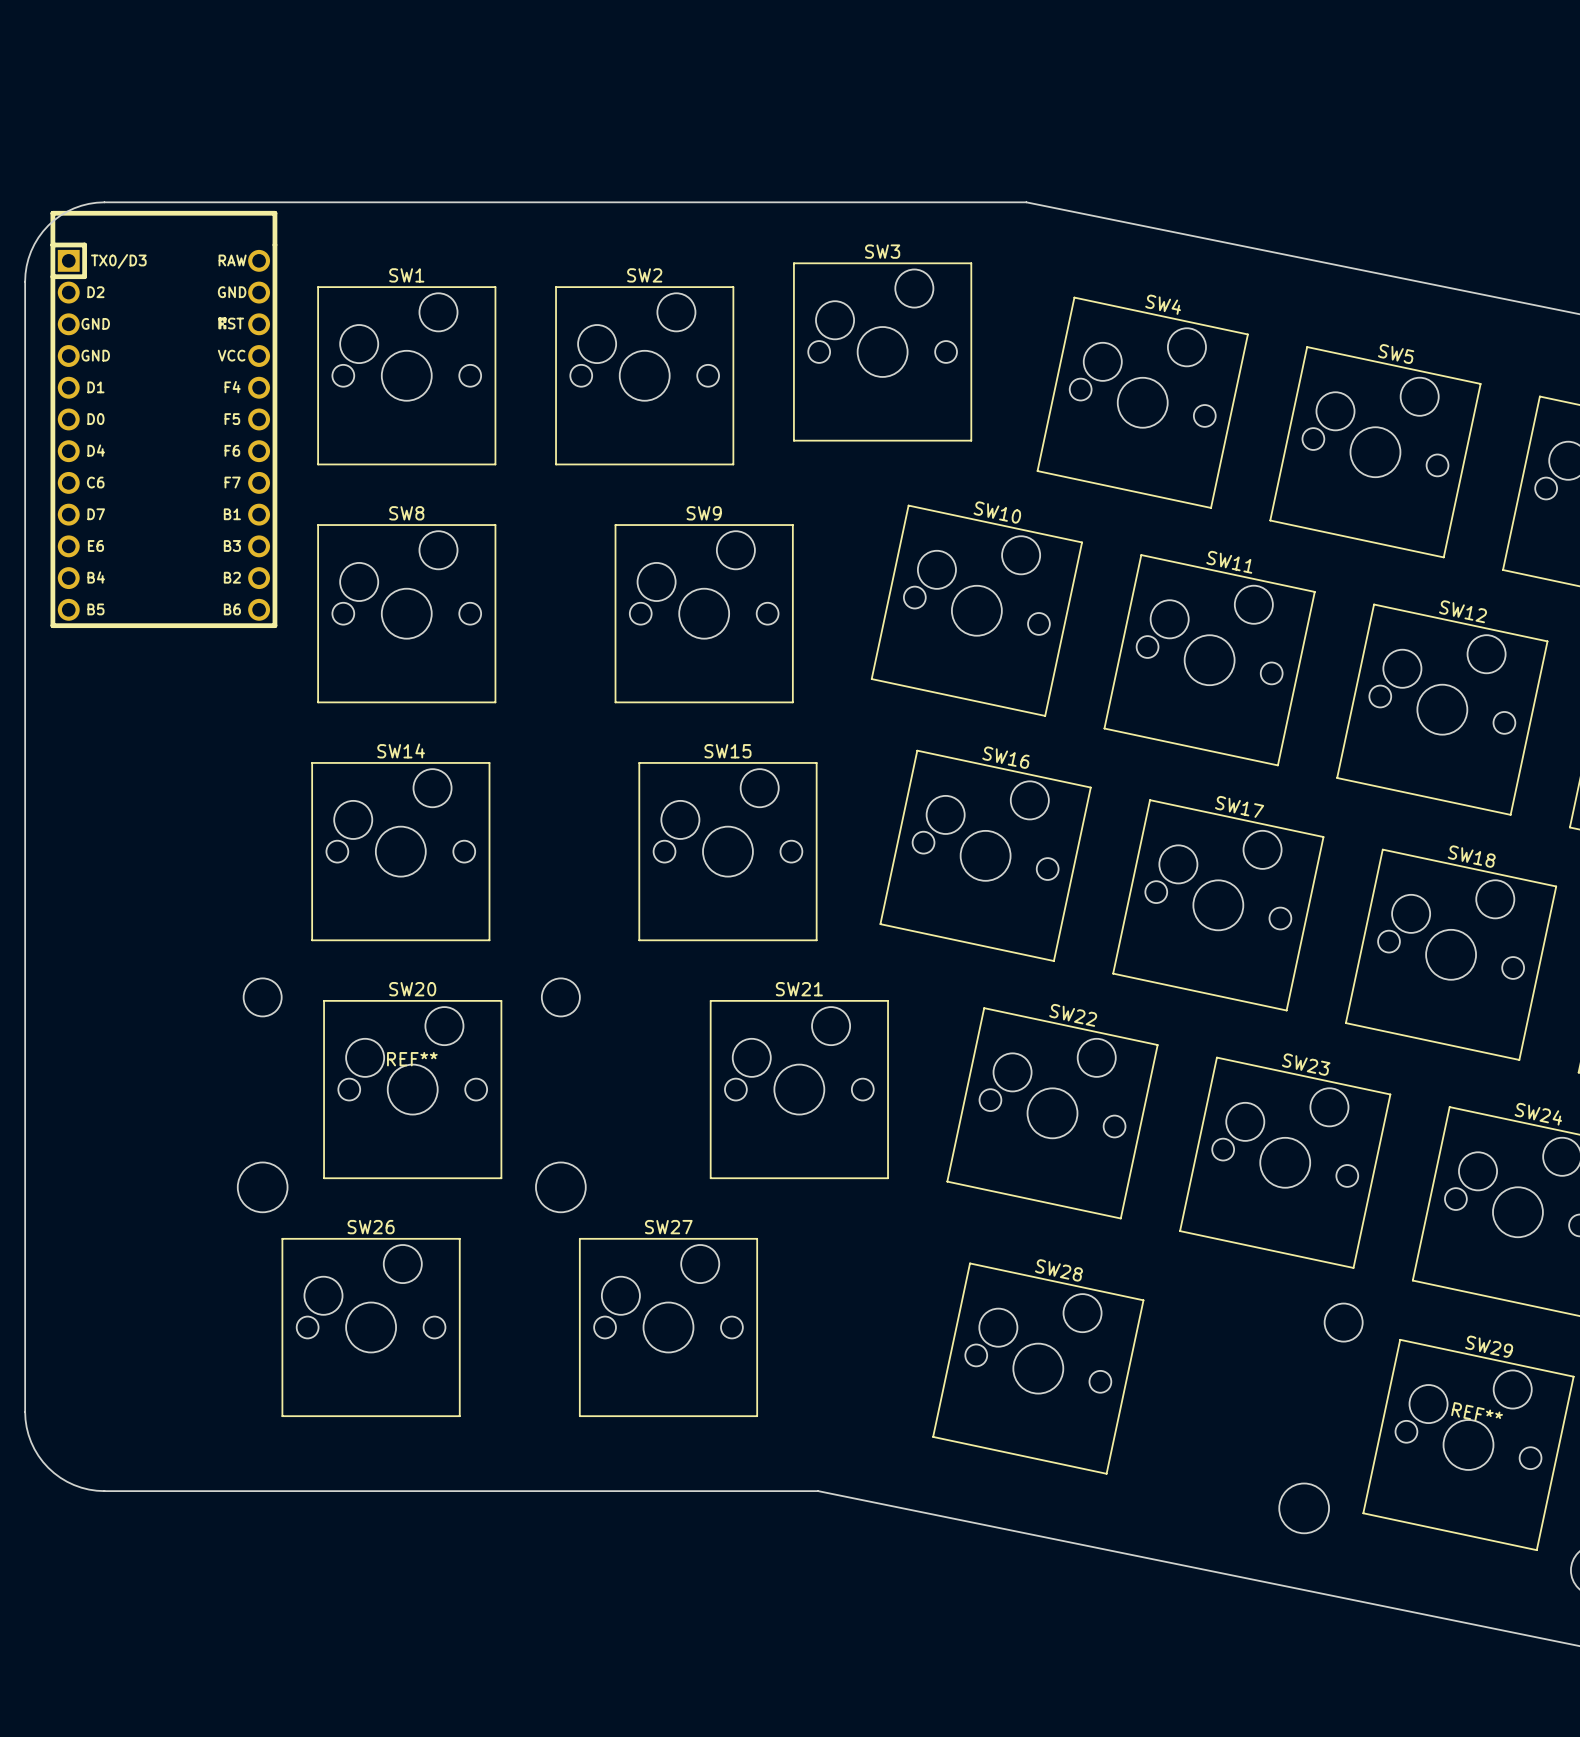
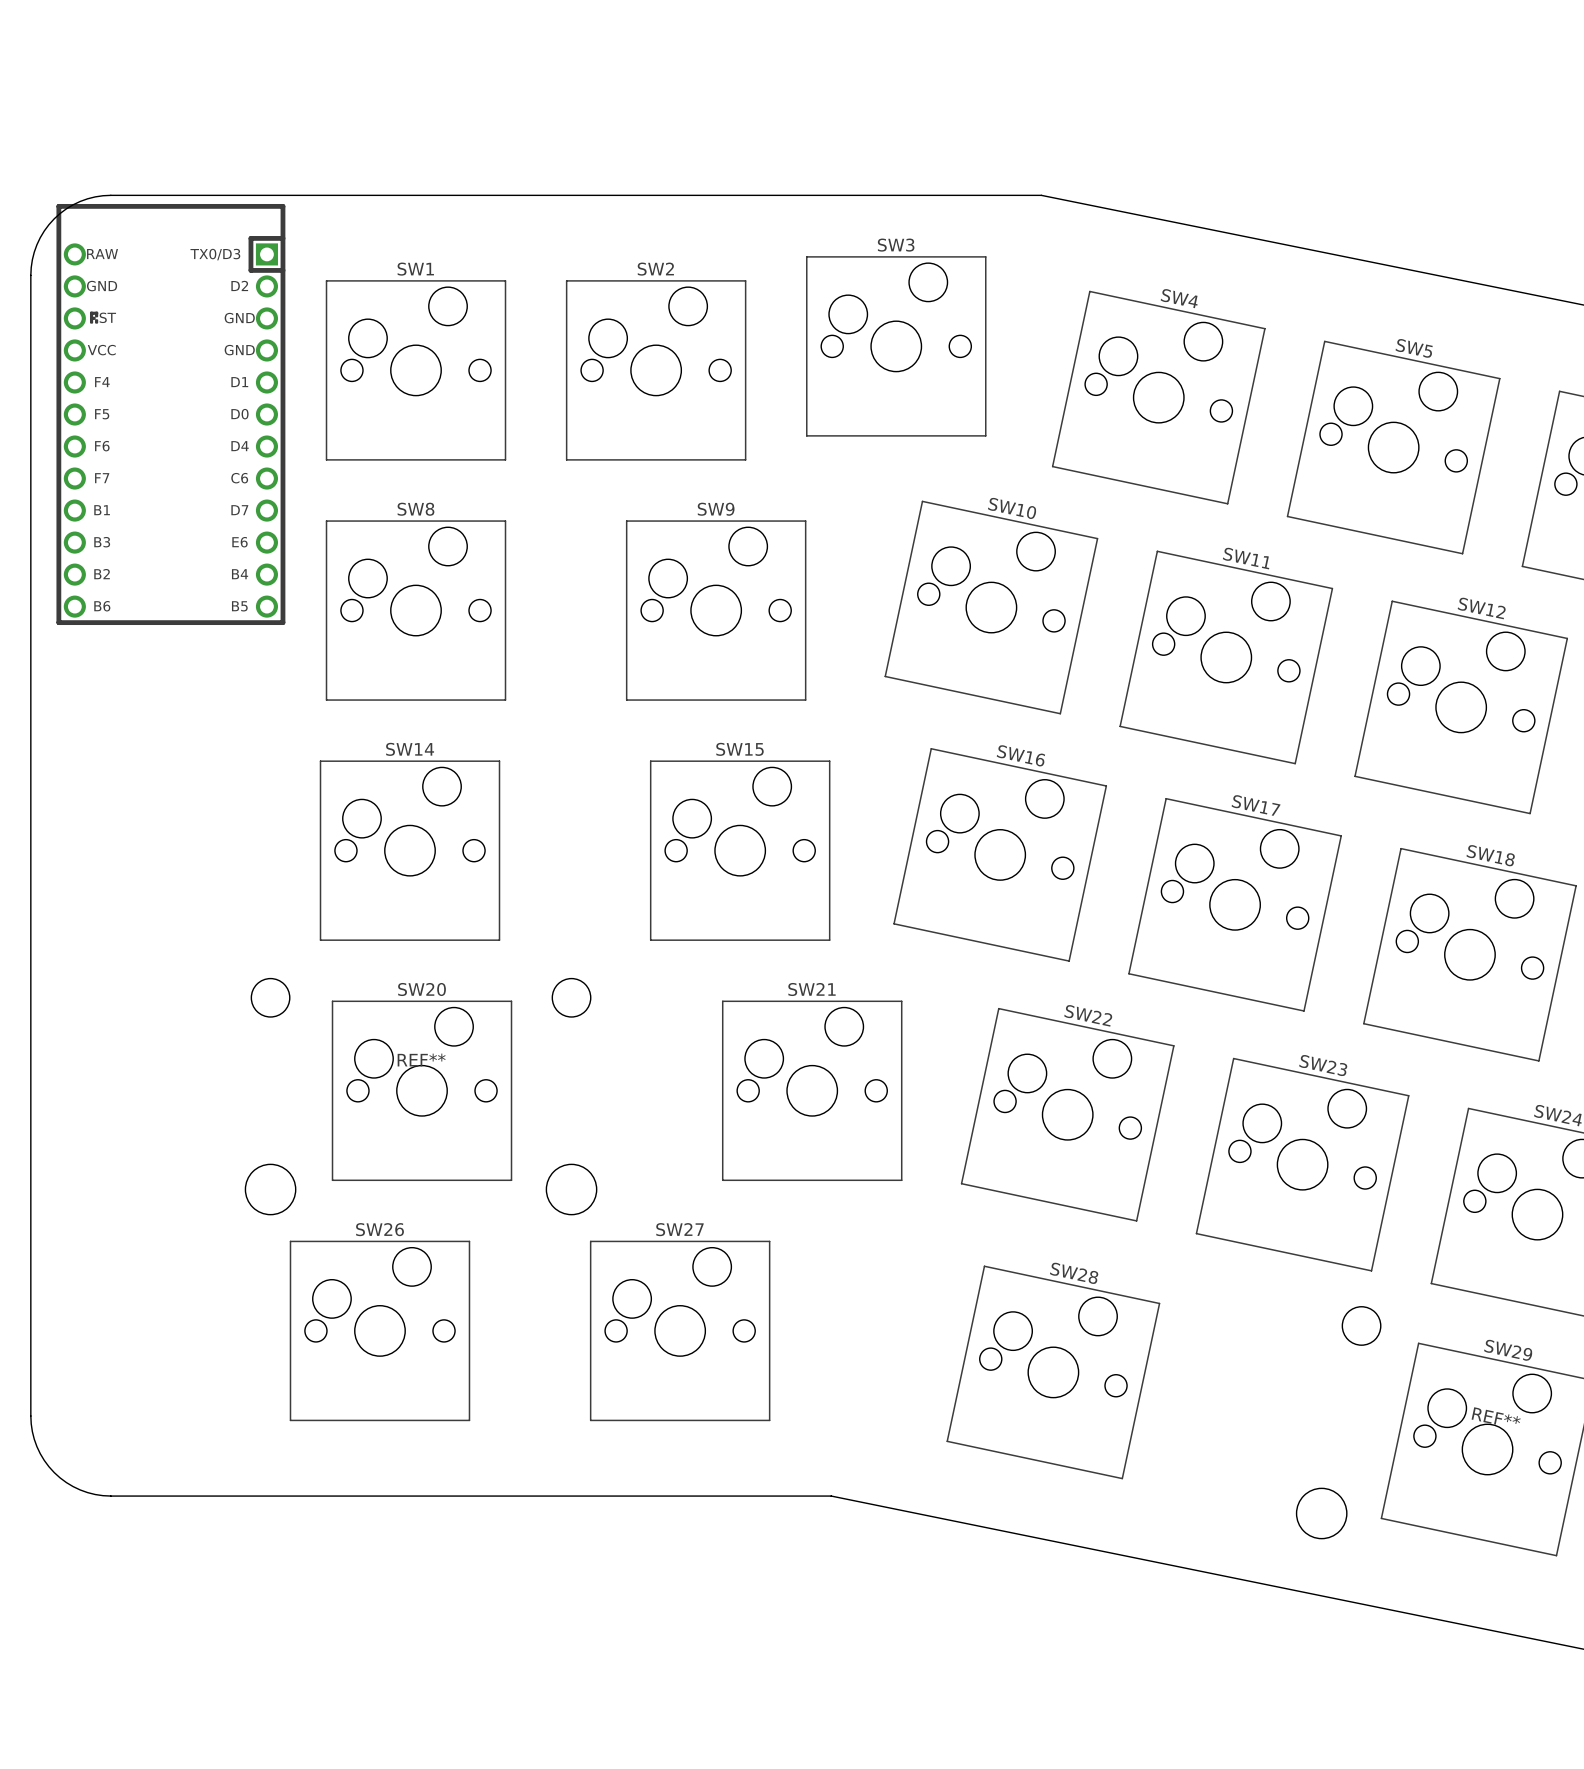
part side: top (163, 419) -> bottom (170, 414)

